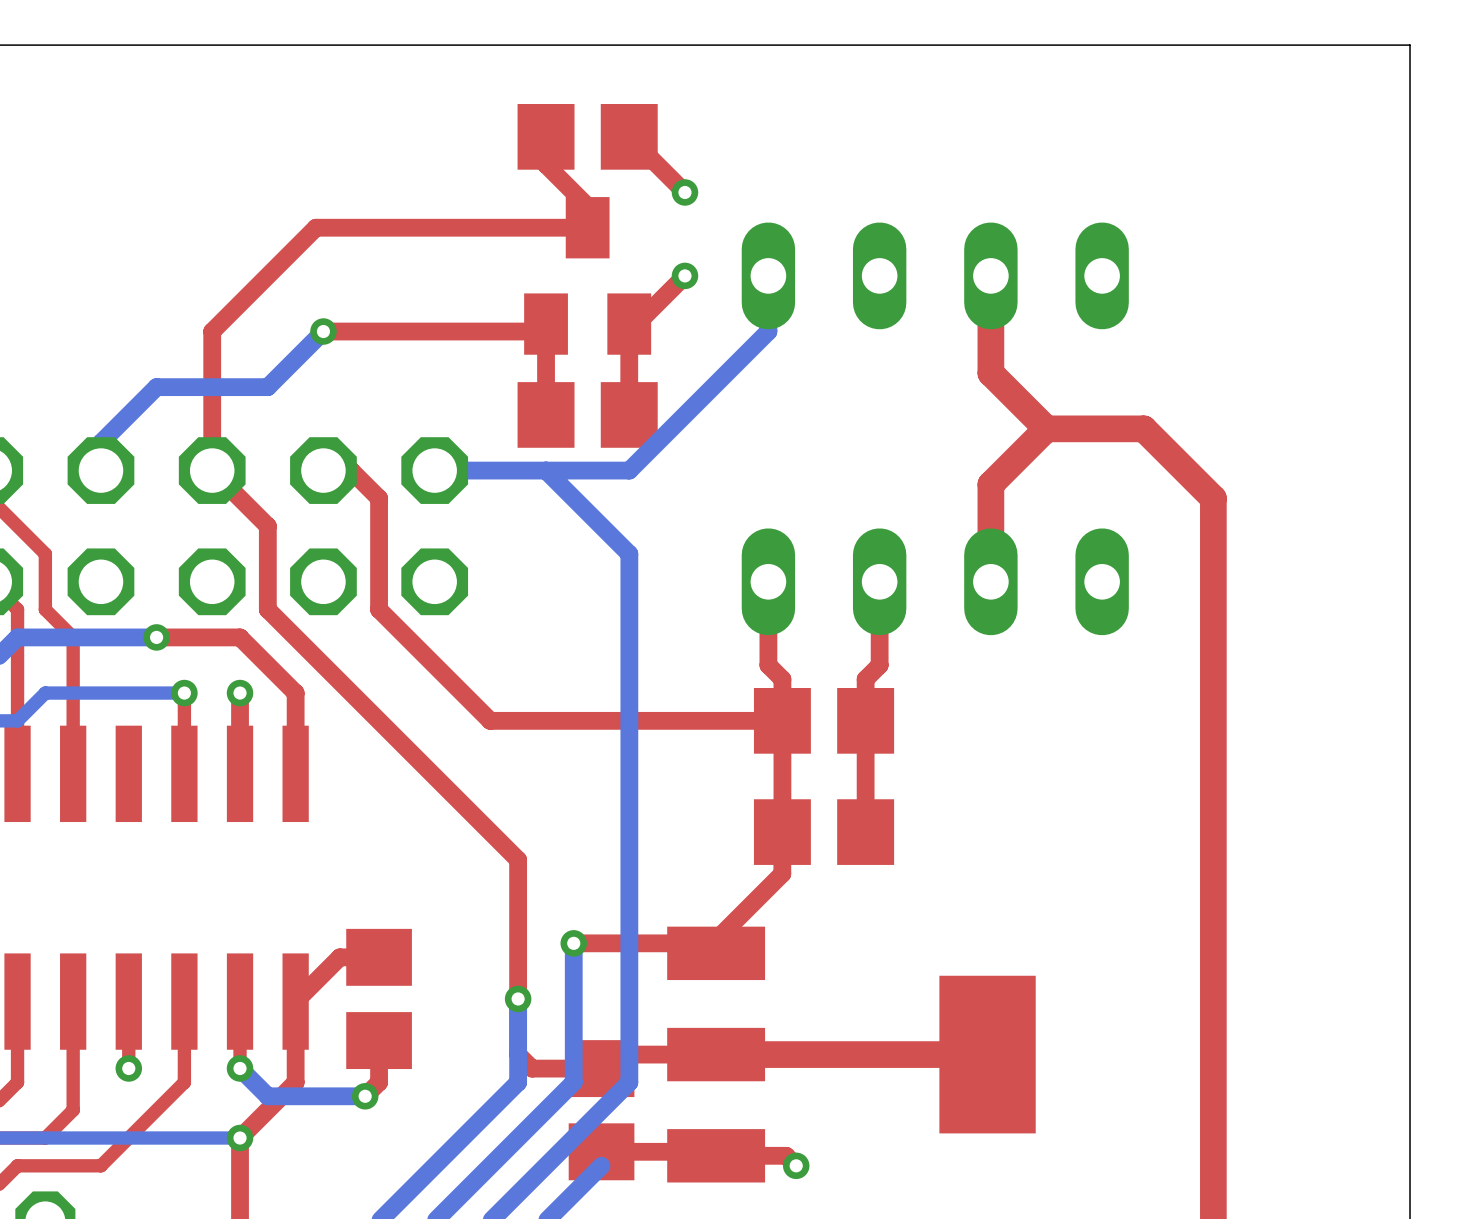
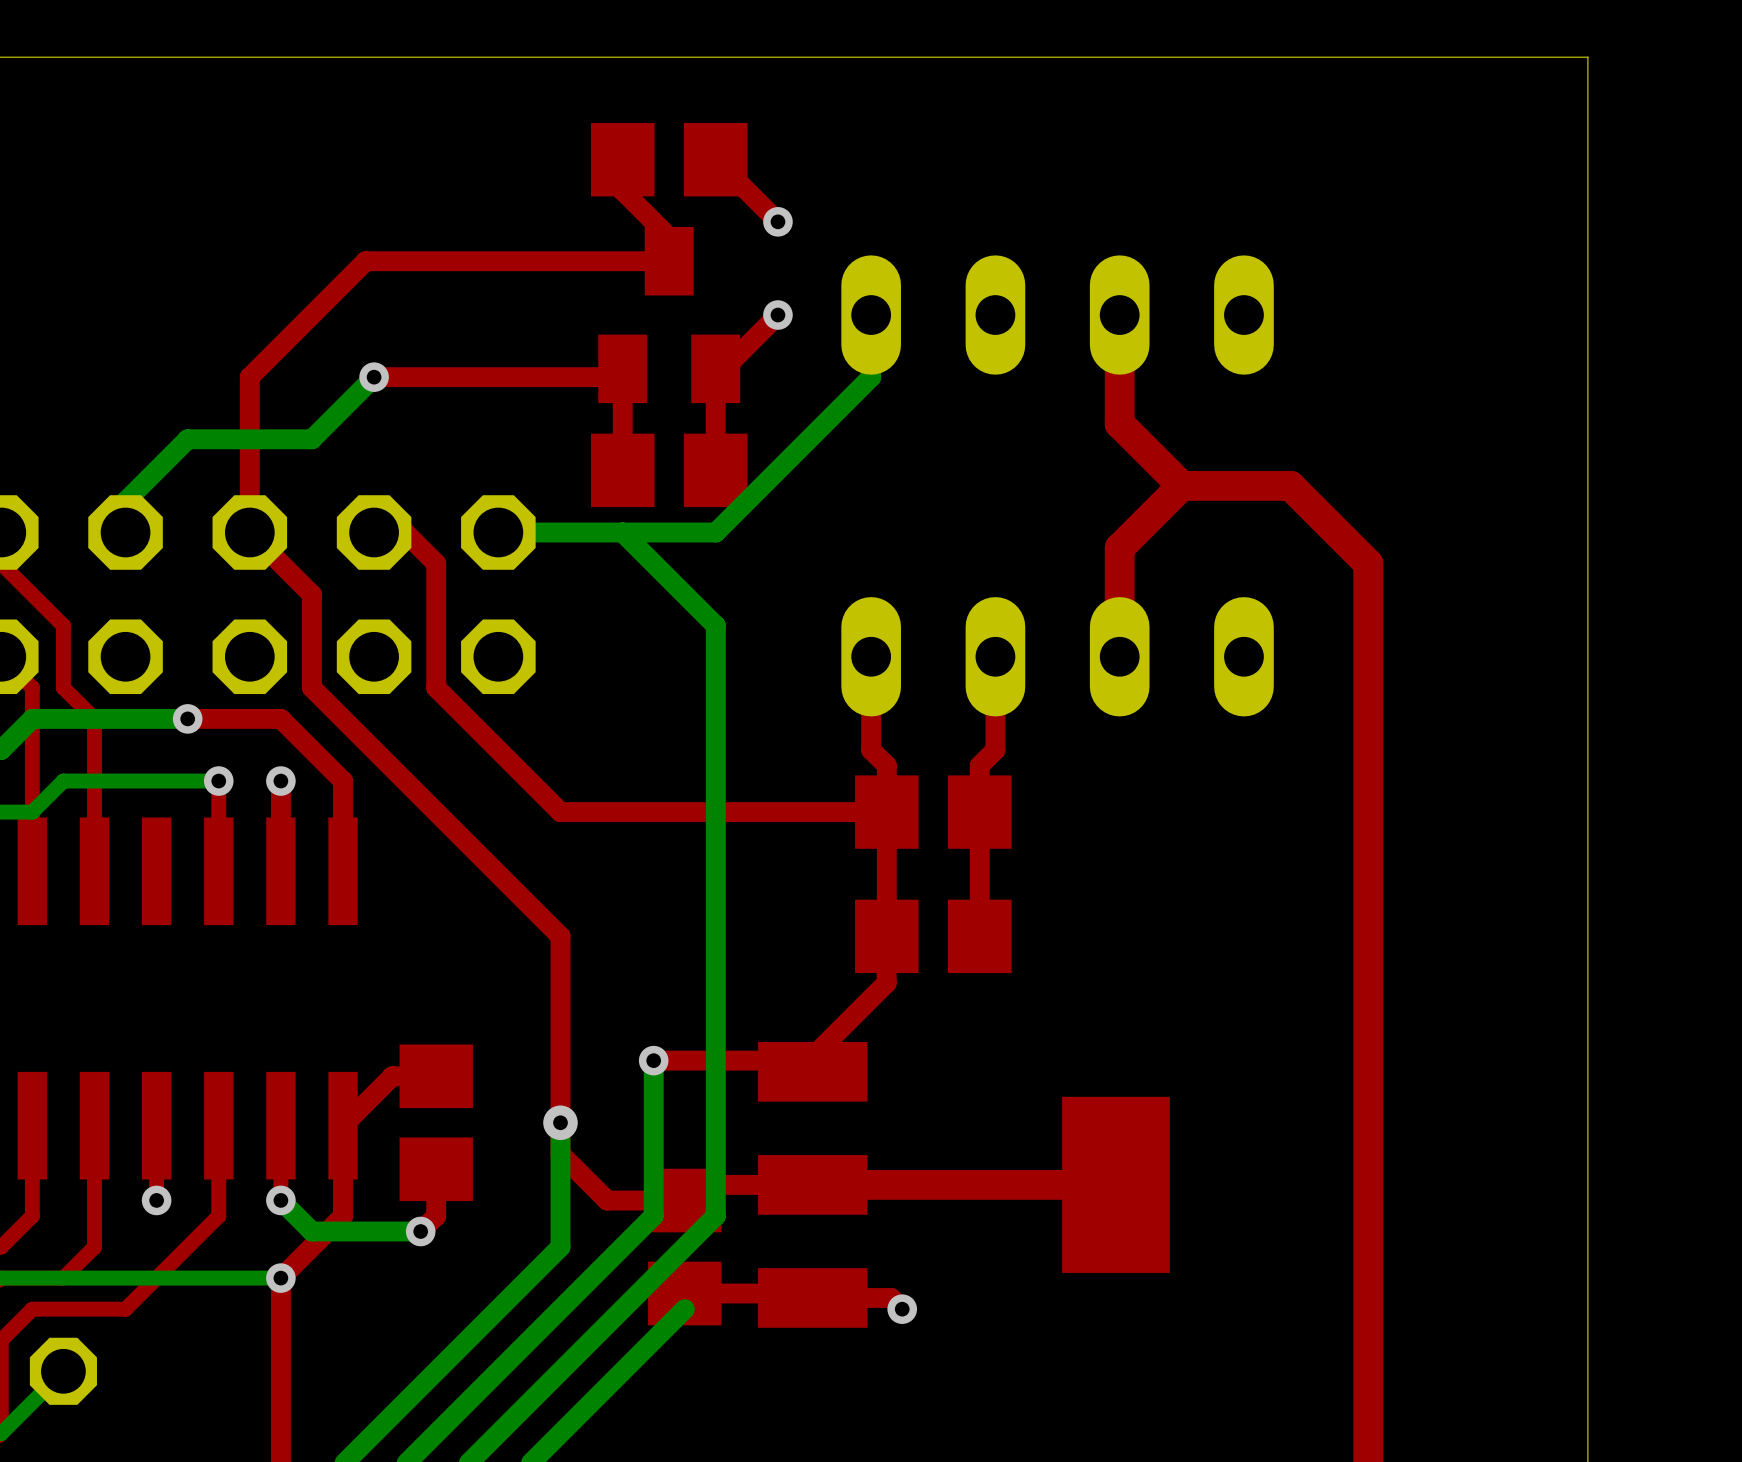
top track: (490, 832) (518, 859) (518, 1054) -> (560, 936) (560, 1153) (591, 1184)
bottom track: (518, 998) (518, 1082) (490, 1110) -> (560, 1122) (560, 1247)
via position: (518, 998) -> (560, 1122)

